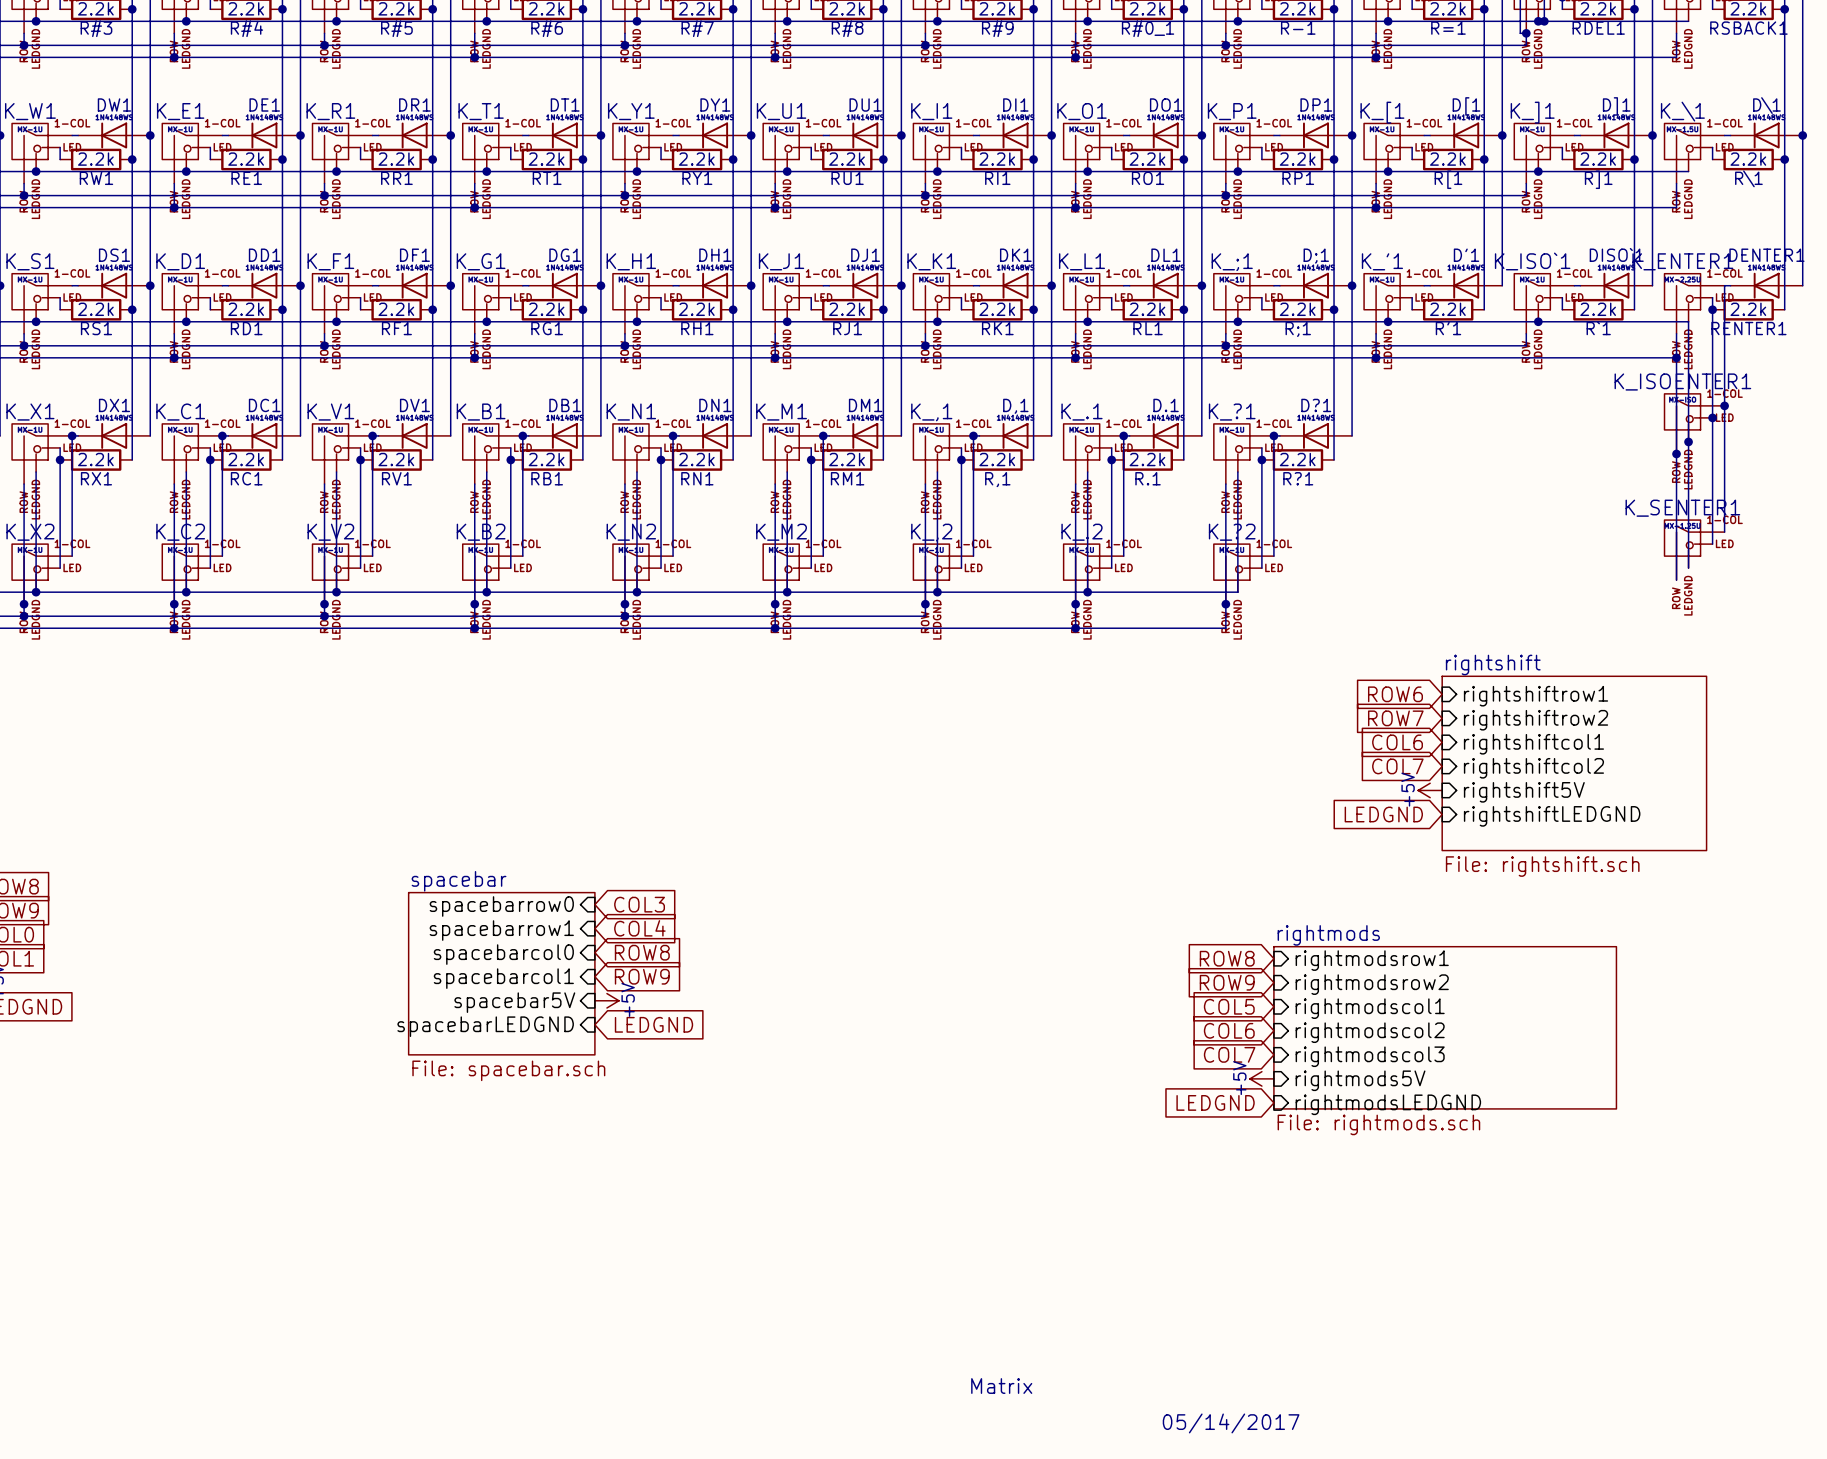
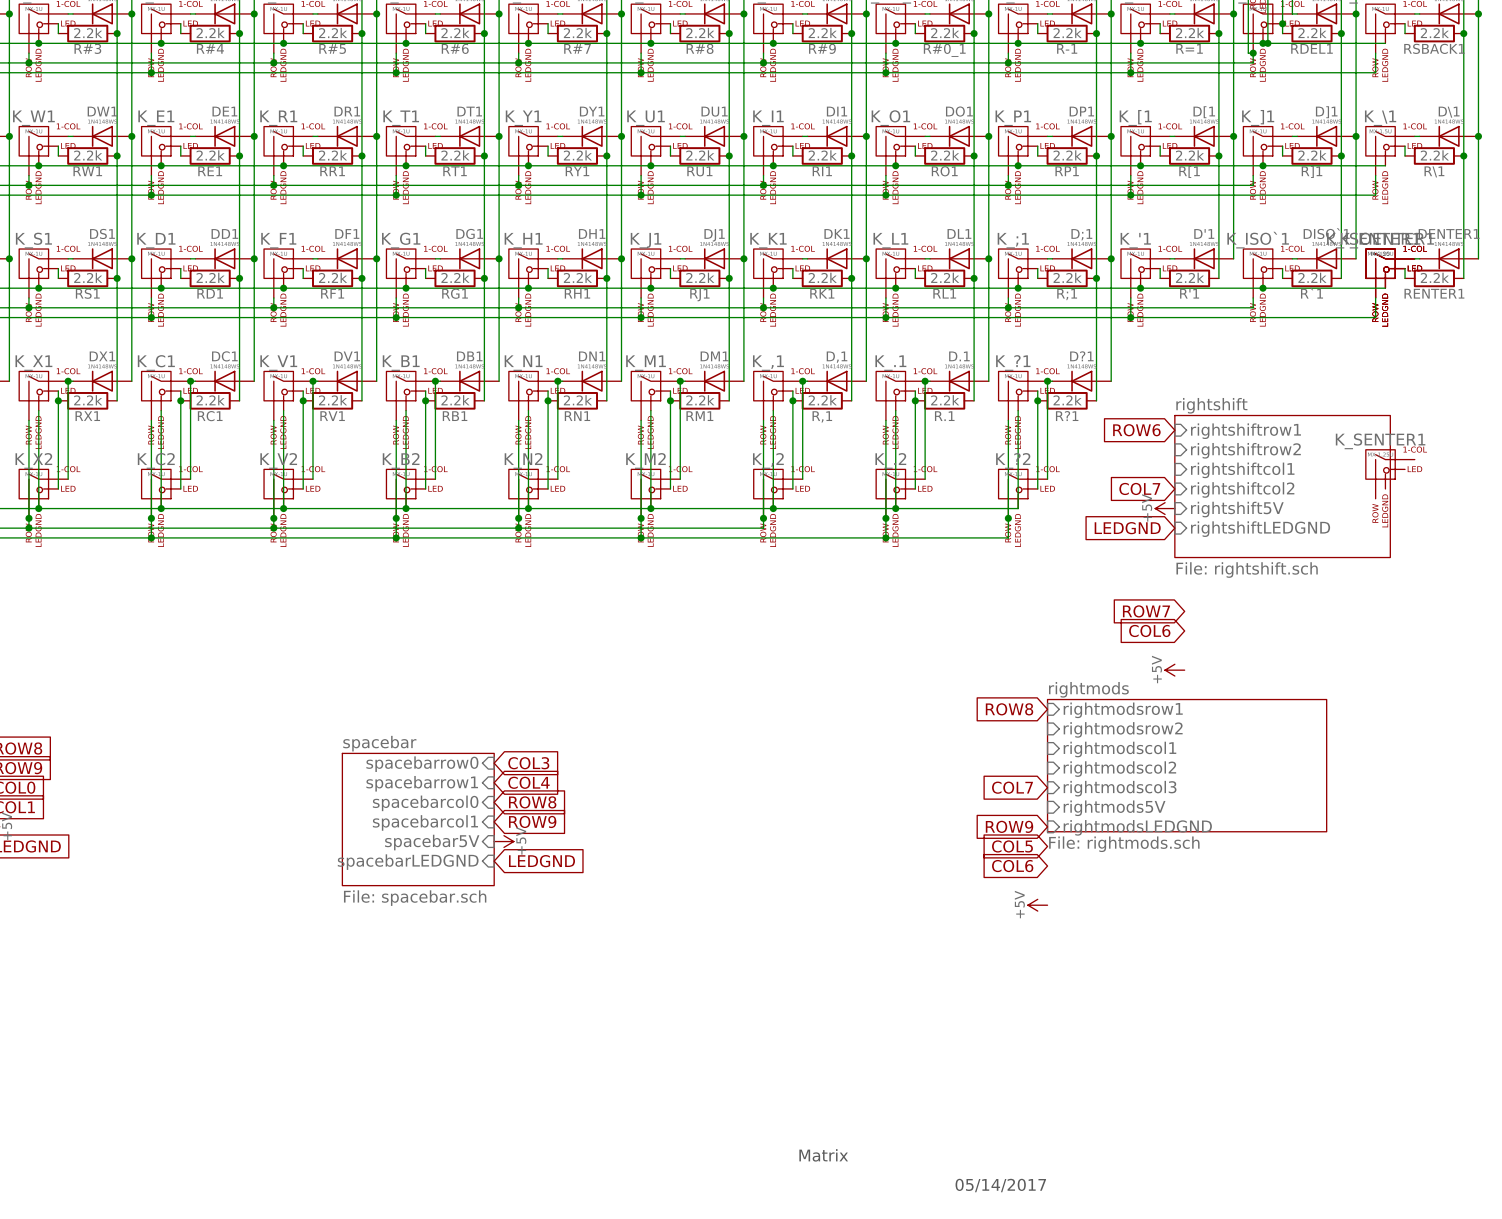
wire: (1724, 285) (1724, 532) -> none
wire: (1712, 309) (1712, 544) -> none
junction: (1712, 309) -> none
wire: (1688, 321) (1688, 568) -> none
wire: (1676, 357) (1676, 580) -> none
junction: (1676, 357) -> none
junction: (1724, 405) -> none
junction: (1712, 417) -> none
K_ISOENTER1 position: (1694, 423) -> (1390, 273)
junction: (1688, 441) -> none
junction: (1676, 453) -> none
global label: none -> COL7 (1139, 488)
power symbol: none -> +5V (1165, 508)
global label position: ROW6 (1395, 694) -> ROW6 (1136, 430)
sheet pin position: rightshiftrow1 (1536, 696) -> rightshiftrow1 (1245, 431)
sheet pin position: rightshiftrow2 (1536, 720) -> rightshiftrow2 (1245, 450)
sheet pin position: rightshiftcol1 (1533, 744) -> rightshiftcol1 (1242, 470)
sheet rightshift position: (1574, 763) -> (1282, 486)
global label: COL7 (1397, 766) -> none
sheet pin position: rightshiftcol2 (1533, 768) -> rightshiftcol2 (1242, 489)
sheet pin position: rightshift5V (1524, 792) -> rightshift5V (1237, 509)
global label position: LEDGND (1383, 814) -> LEDGND (1127, 528)
sheet pin position: rightshiftLEDGND (1552, 816) -> rightshiftLEDGND (1260, 529)
sheet pin: none -> rightmodsrow1 (1123, 710)
sheet pin: none -> rightmodsrow2 (1123, 729)
global label: none -> COL7 (1012, 787)
global label position: ROW8 (1227, 958) -> ROW8 (1009, 709)
sheet pin: rightmodsrow1 (1372, 960) -> rightmods5V (1114, 808)
sheet pin: rightmodsrow2 (1372, 984) -> rightmodsLEDGND (1137, 827)
sheet pin position: rightmodscol1 (1370, 1008) -> rightmodscol1 (1119, 749)
sheet rightmods position: (1445, 1027) -> (1187, 765)
sheet pin position: rightmodscol2 (1370, 1032) -> rightmodscol2 (1119, 769)
global label: COL7 (1229, 1054) -> none
sheet pin position: rightmodscol3 (1370, 1056) -> rightmodscol3 (1120, 788)
sheet pin: rightmods5V (1360, 1080) -> none
global label: LEDGND (1215, 1102) -> none
sheet pin: rightmodsLEDGND (1388, 1104) -> none

